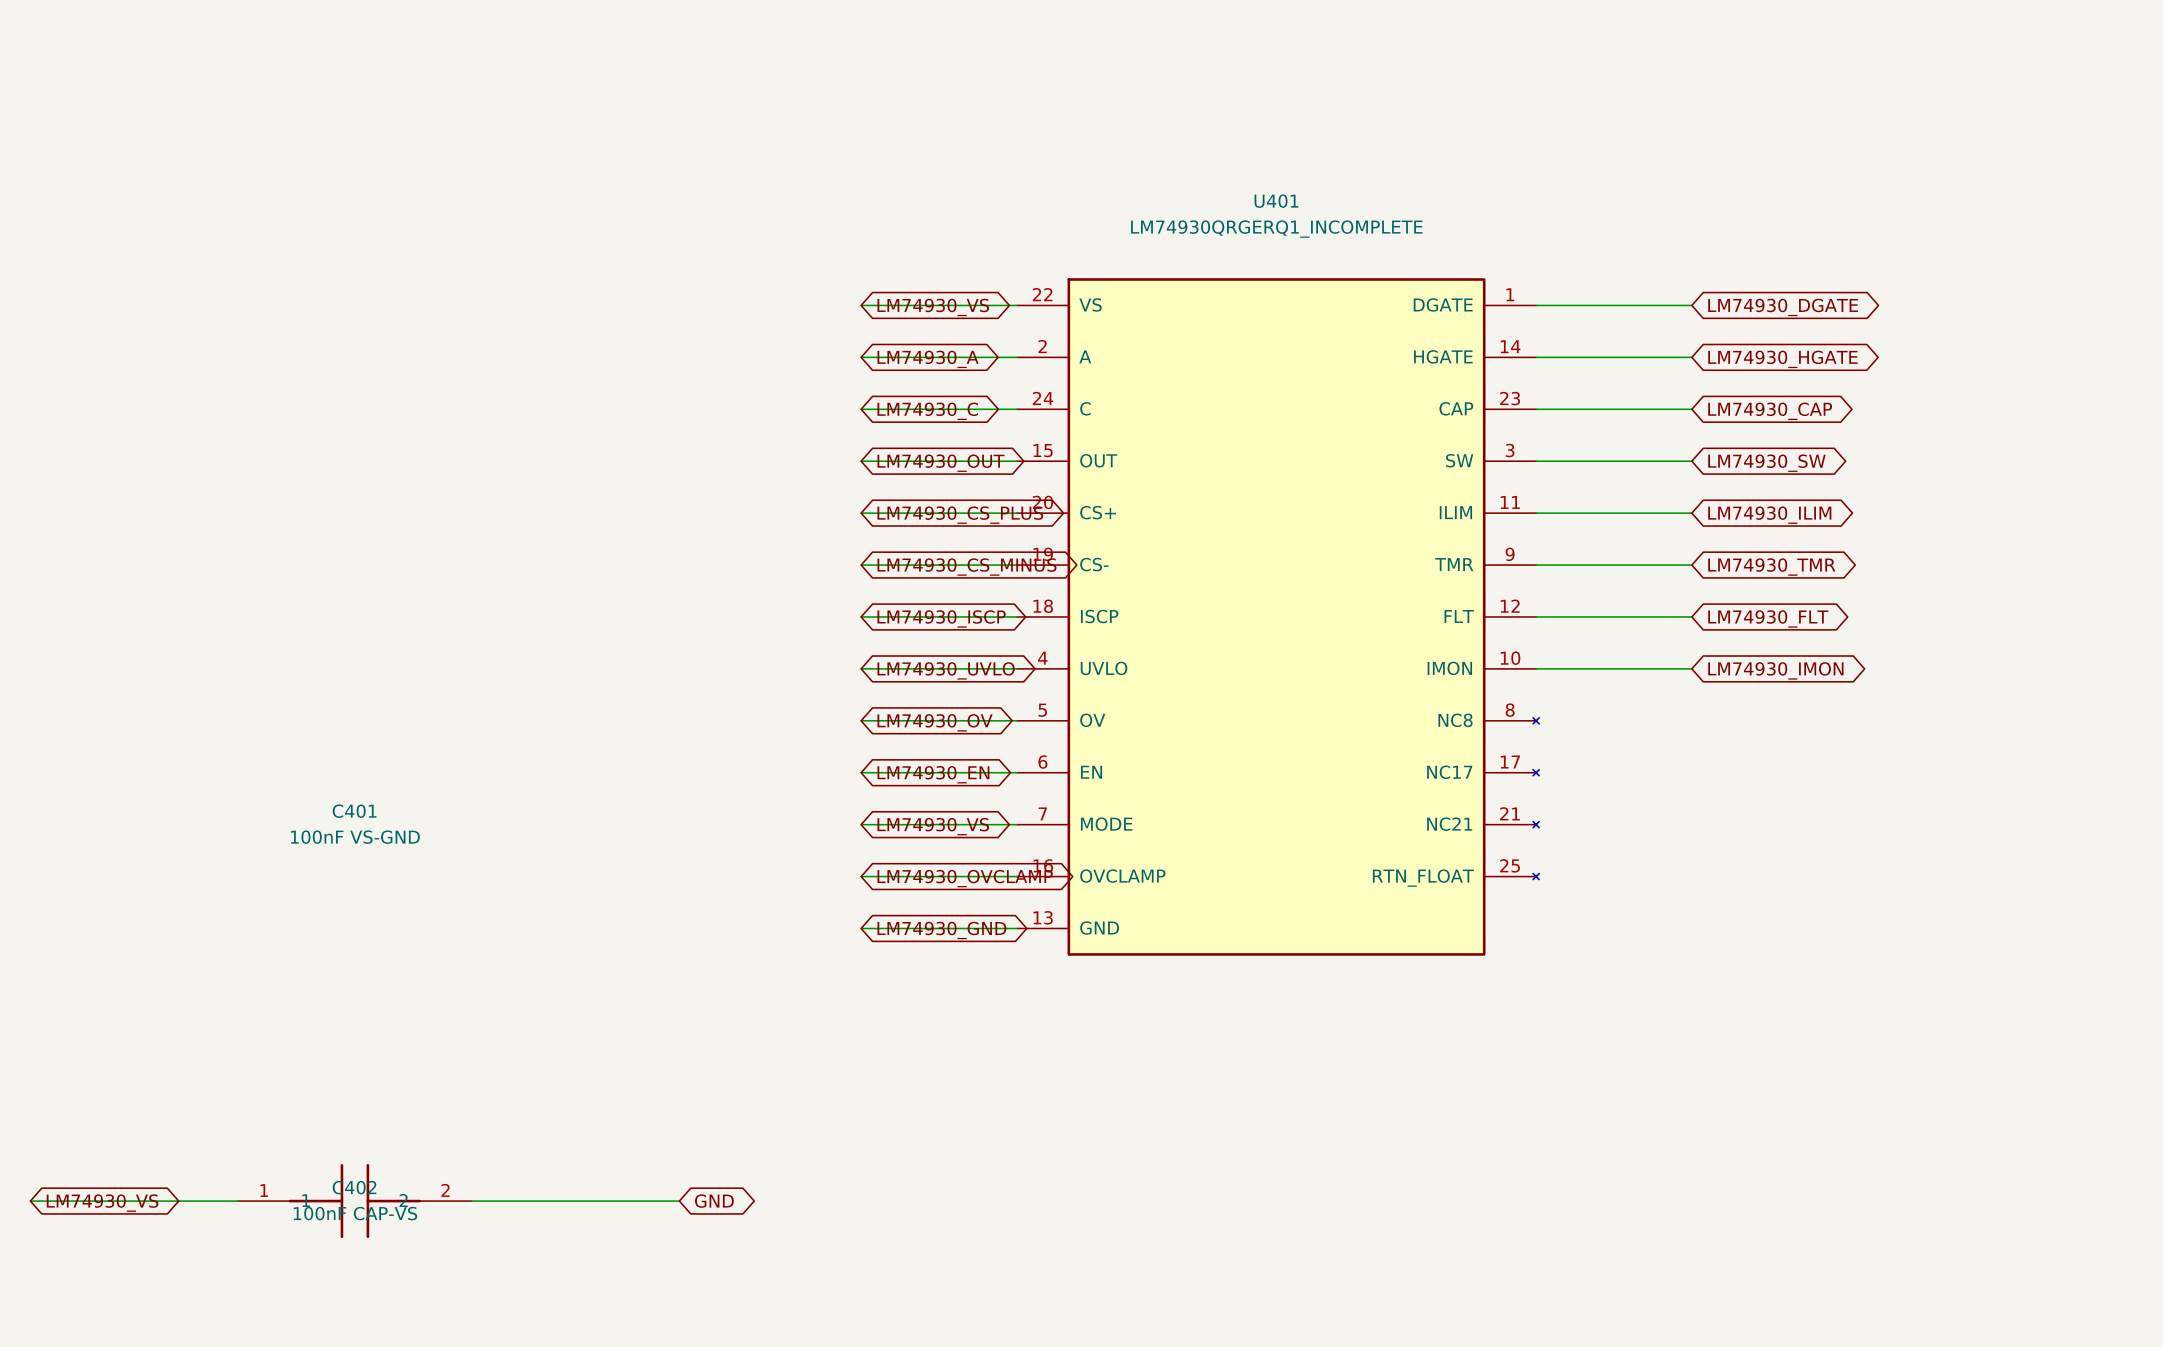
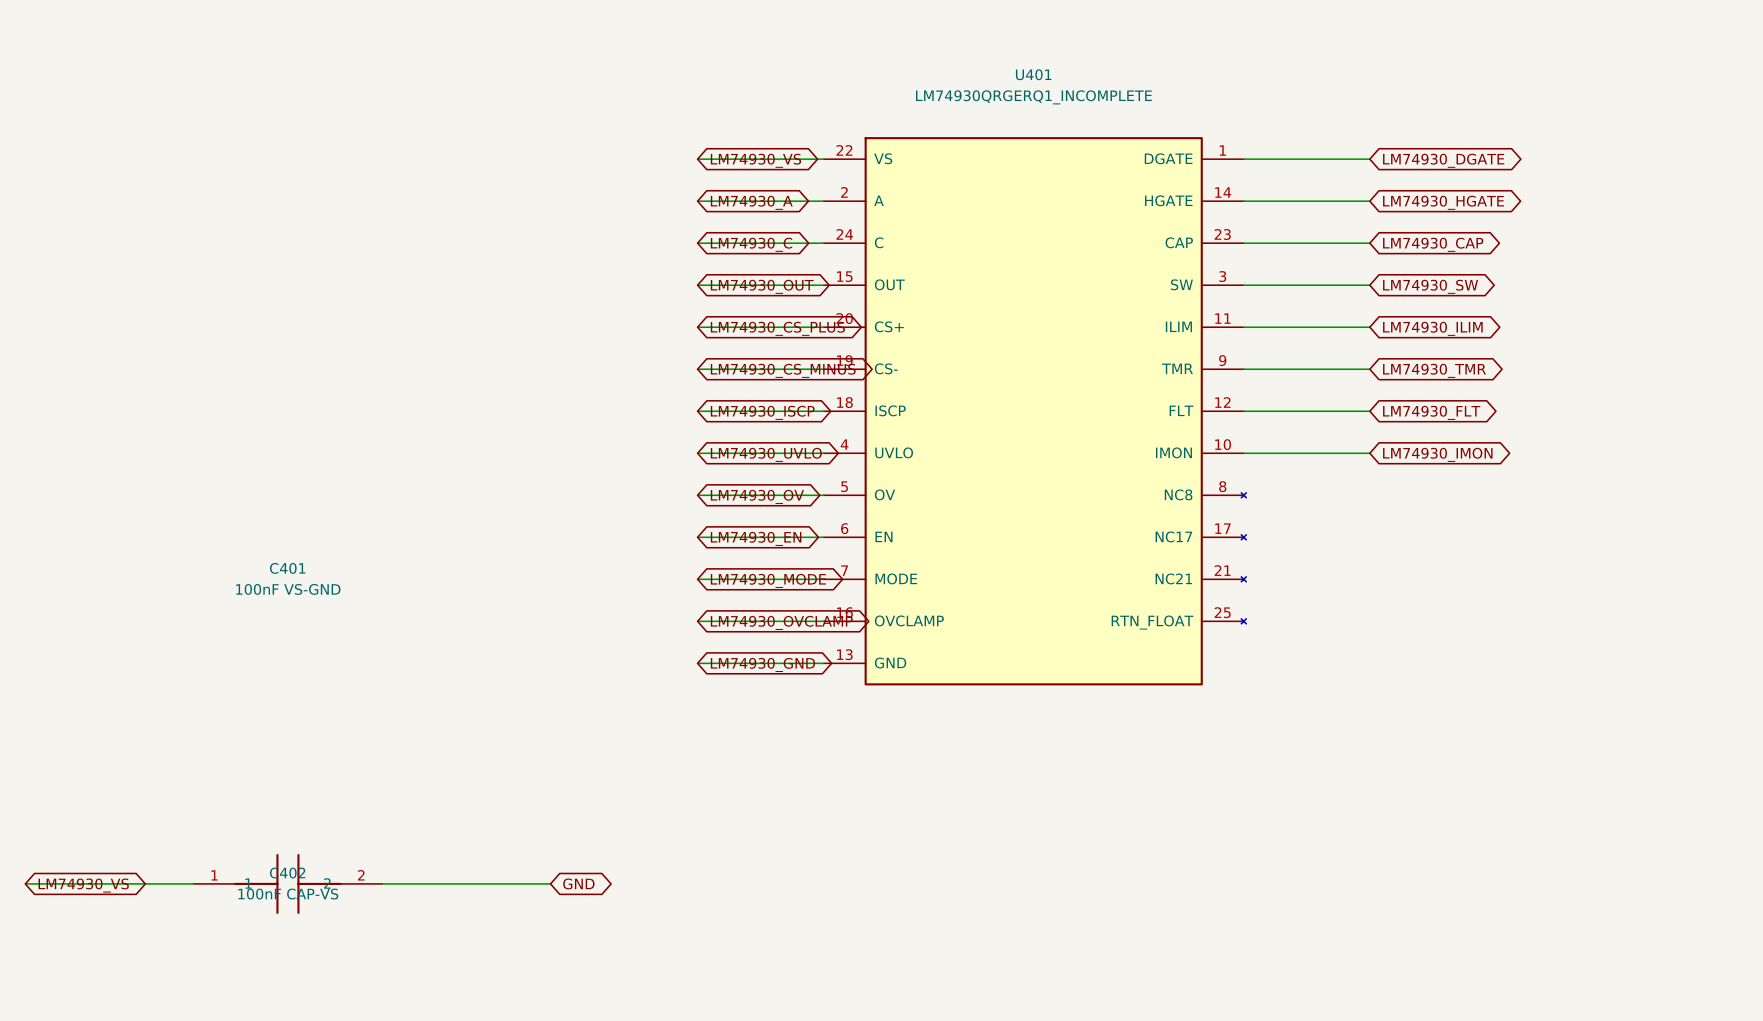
global label: LM74930_VS (933, 826) -> LM74930_MODE (768, 580)

